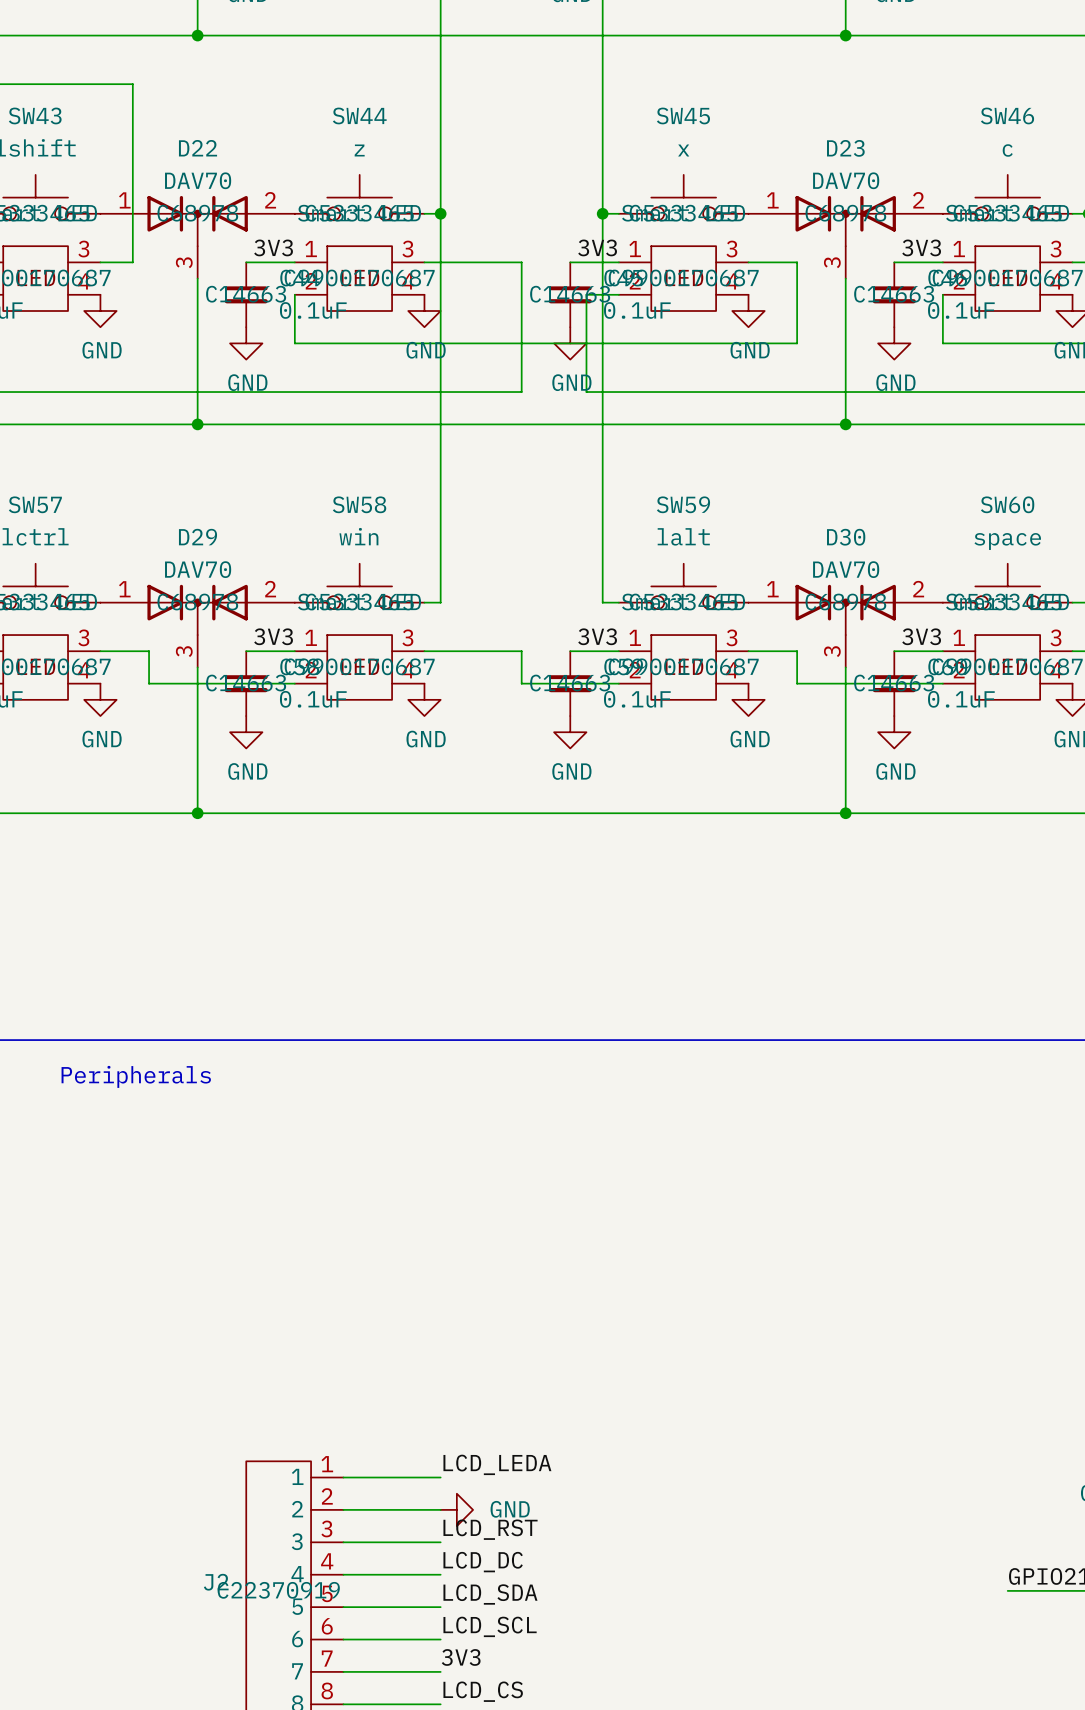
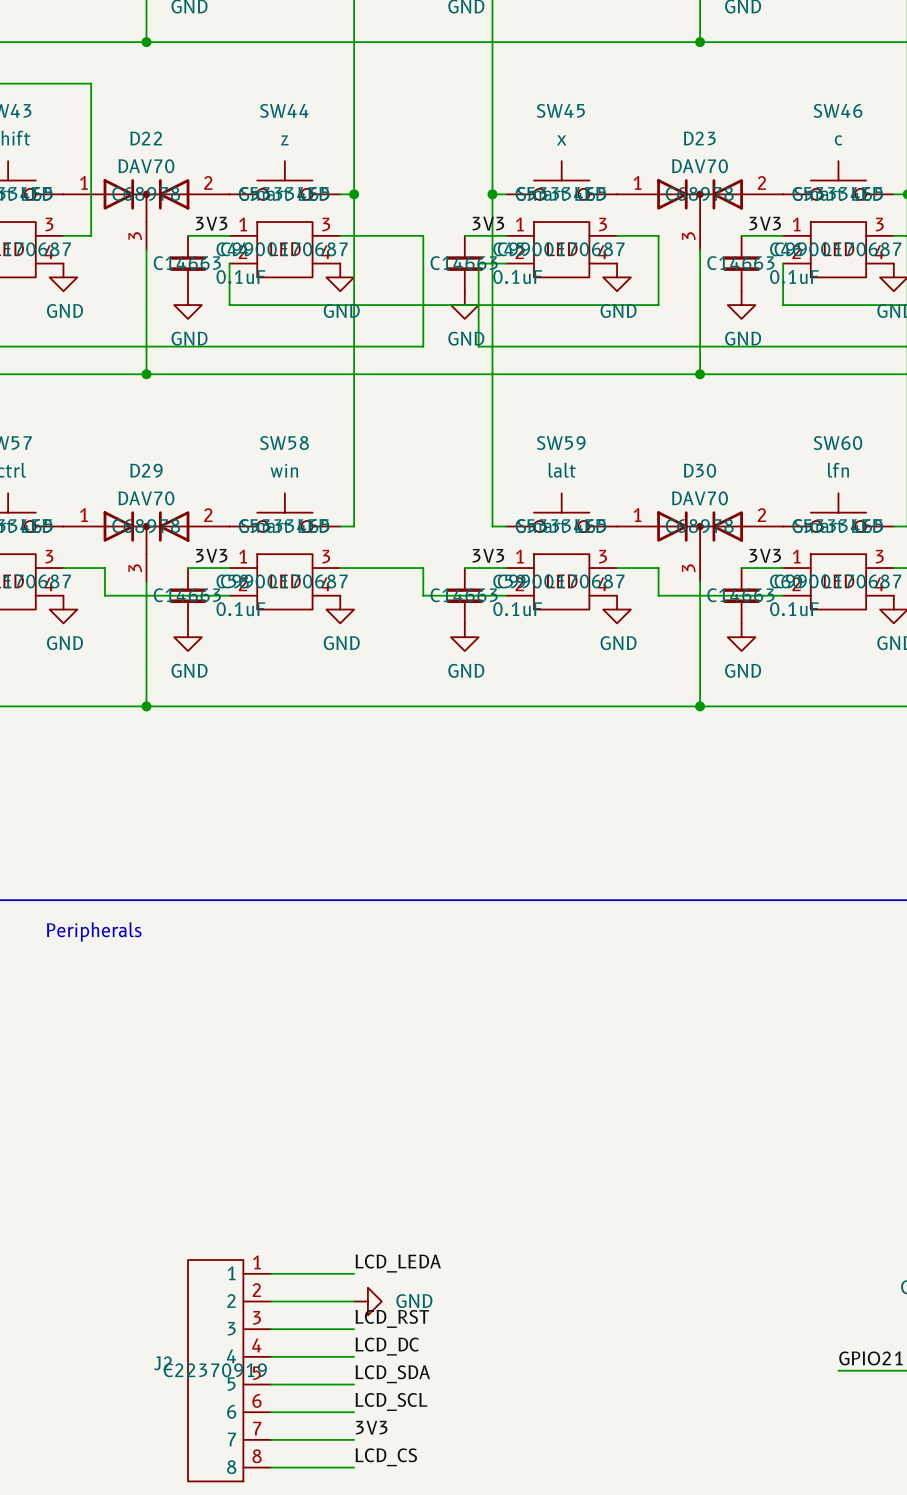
SW60 value: space (1007, 541) -> lfn (838, 470)

